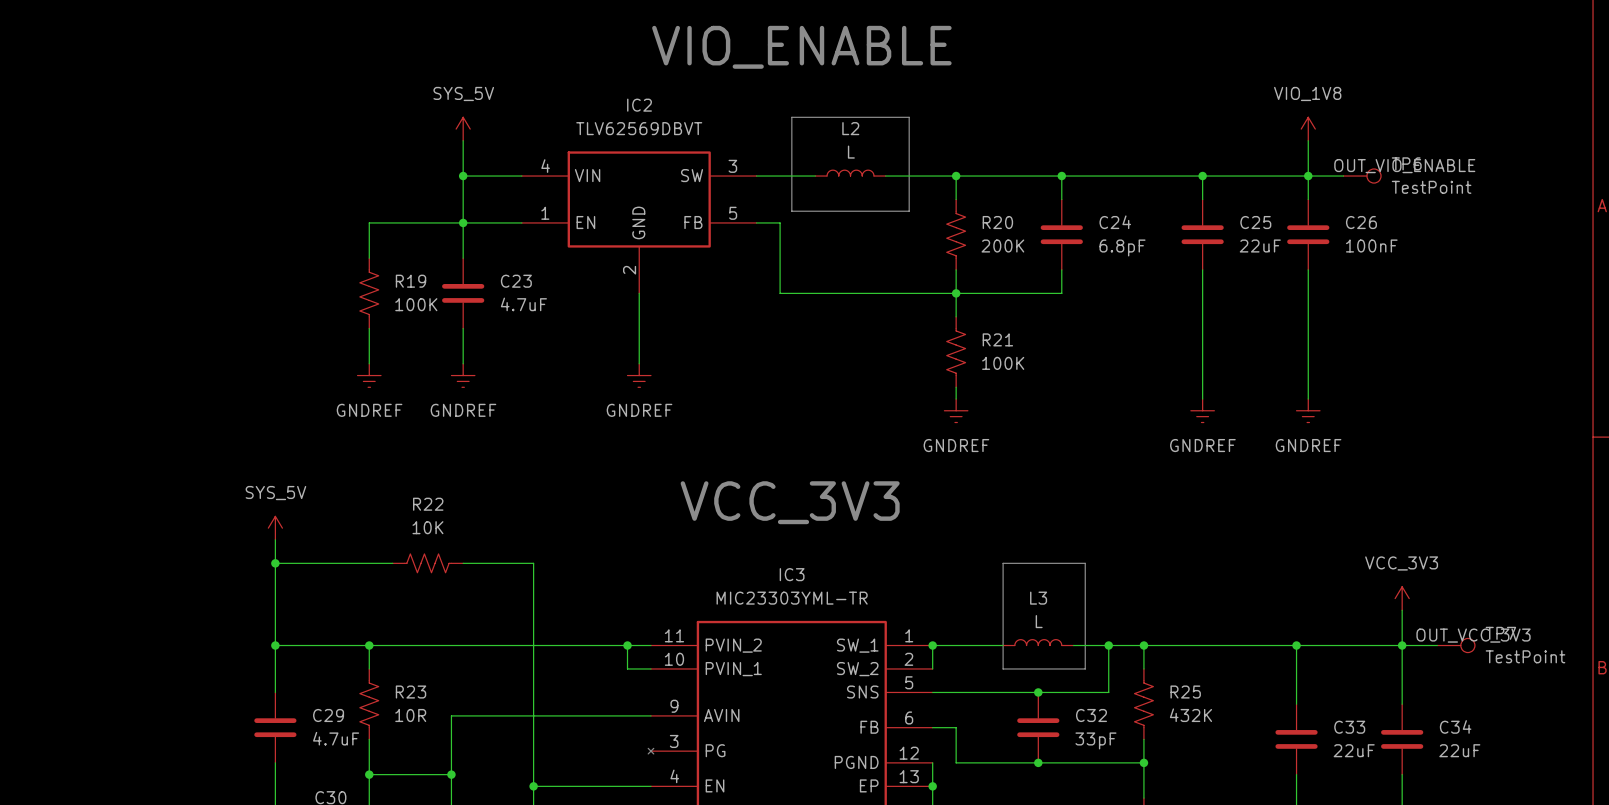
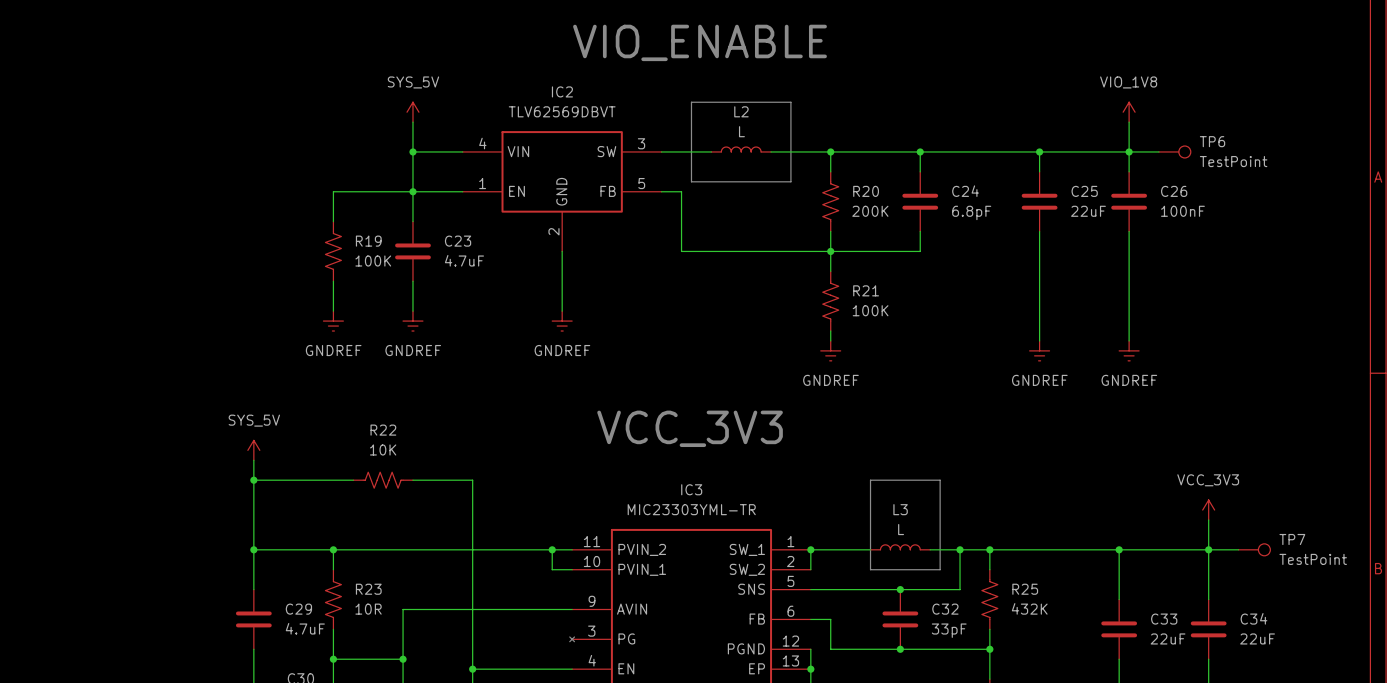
label: OUT_VIO_ENABLE (1404, 166) -> none
label: OUT_VCC_3V3 (1473, 635) -> none

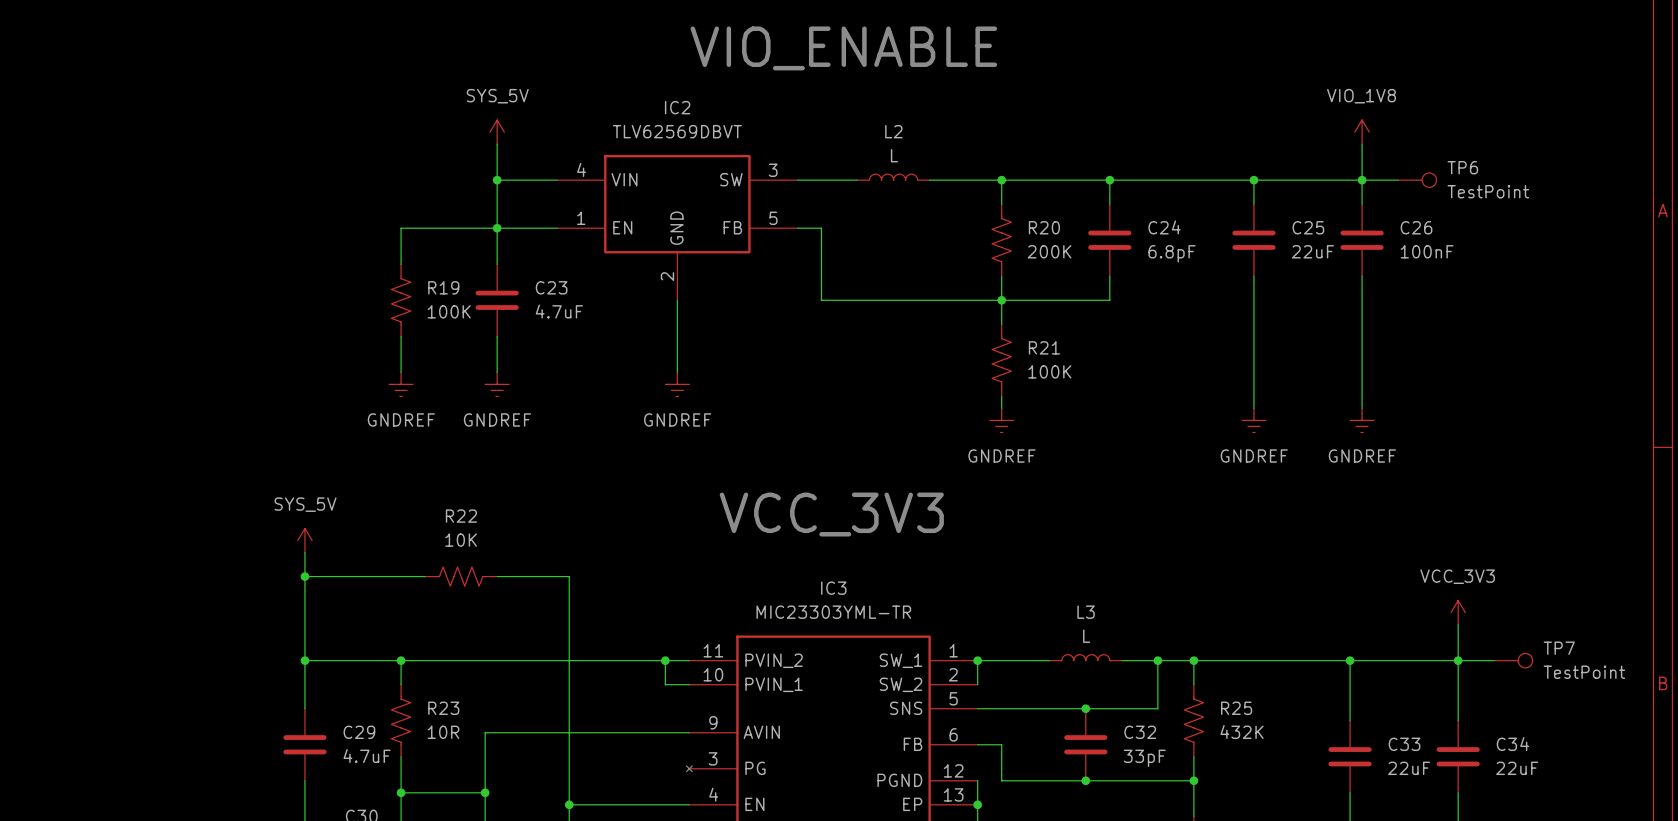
line: (691, 102) (790, 102) (790, 181) (691, 181) (691, 102) -> none
line: (870, 480) (940, 480) (940, 569) (870, 569) (870, 480) -> none

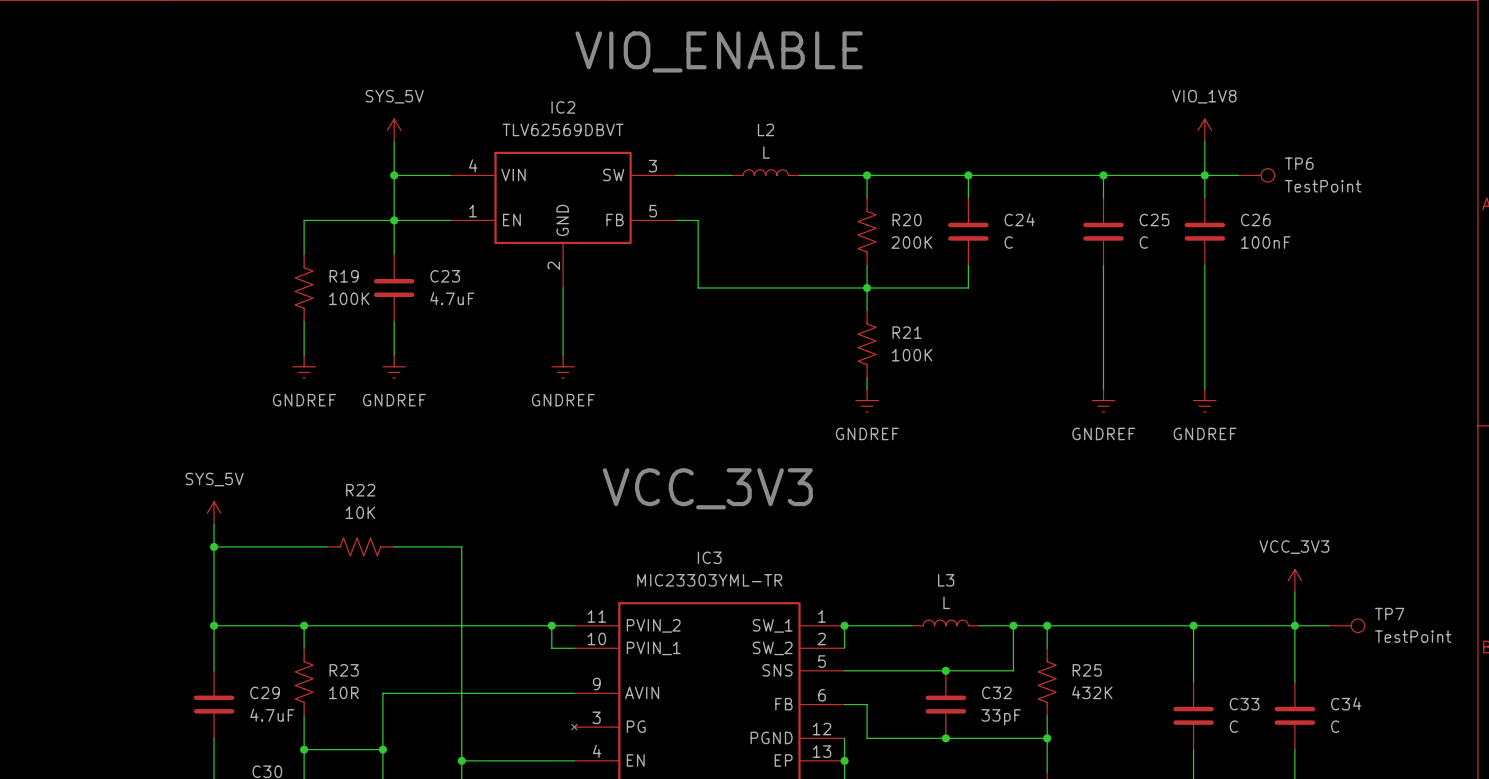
C25 value: 22uF (1312, 251) -> C (1143, 242)
C24 value: 6.8pF (1171, 253) -> C (1008, 242)
C33 value: 22uF (1409, 768) -> C (1233, 726)
C34 value: 22uF (1517, 768) -> C (1335, 726)

